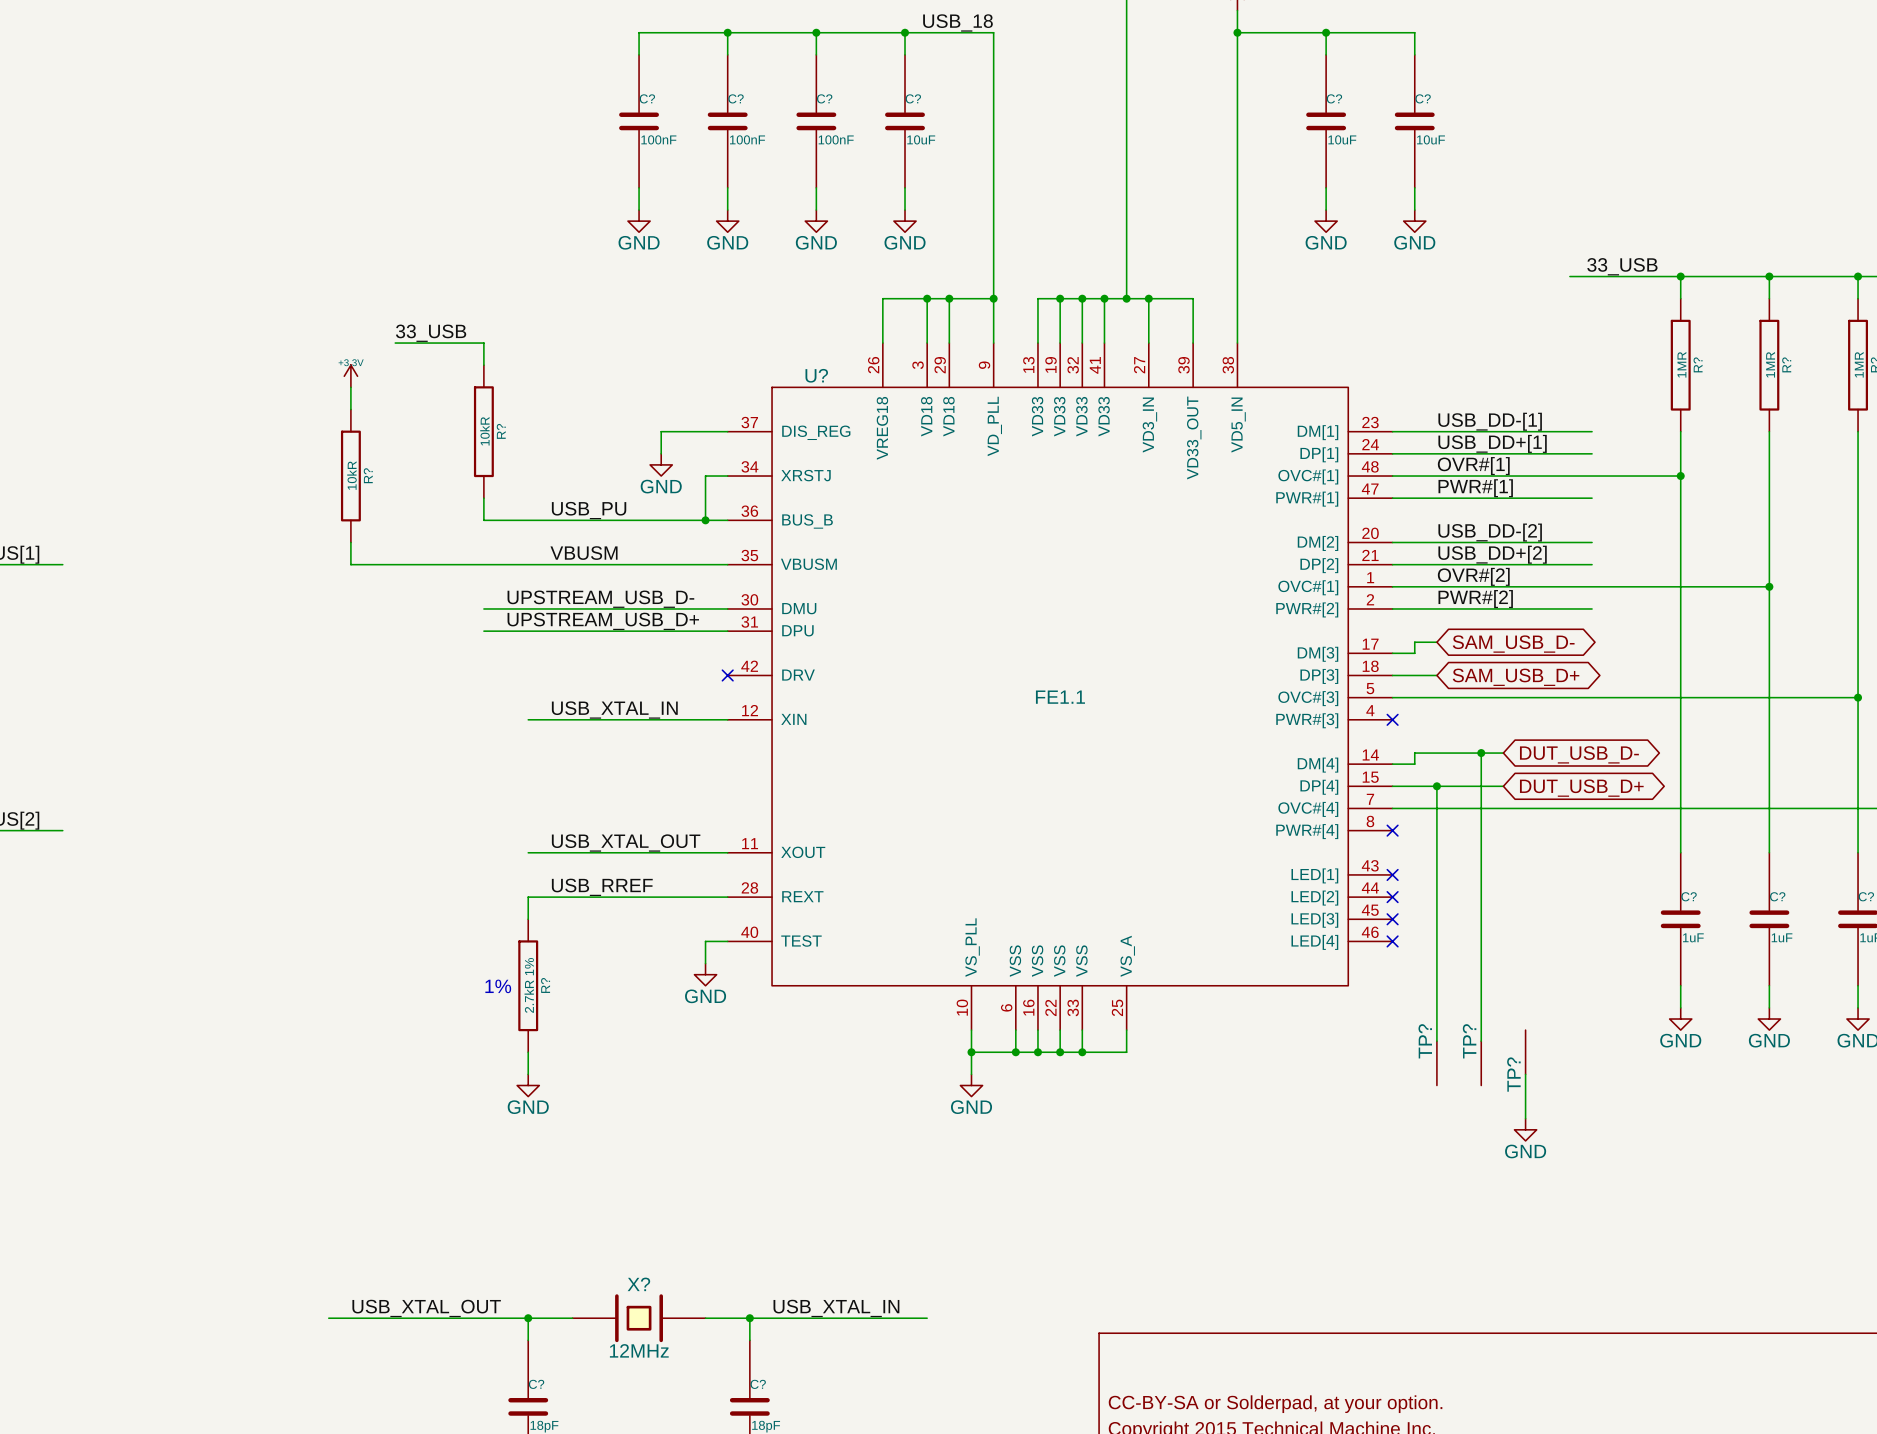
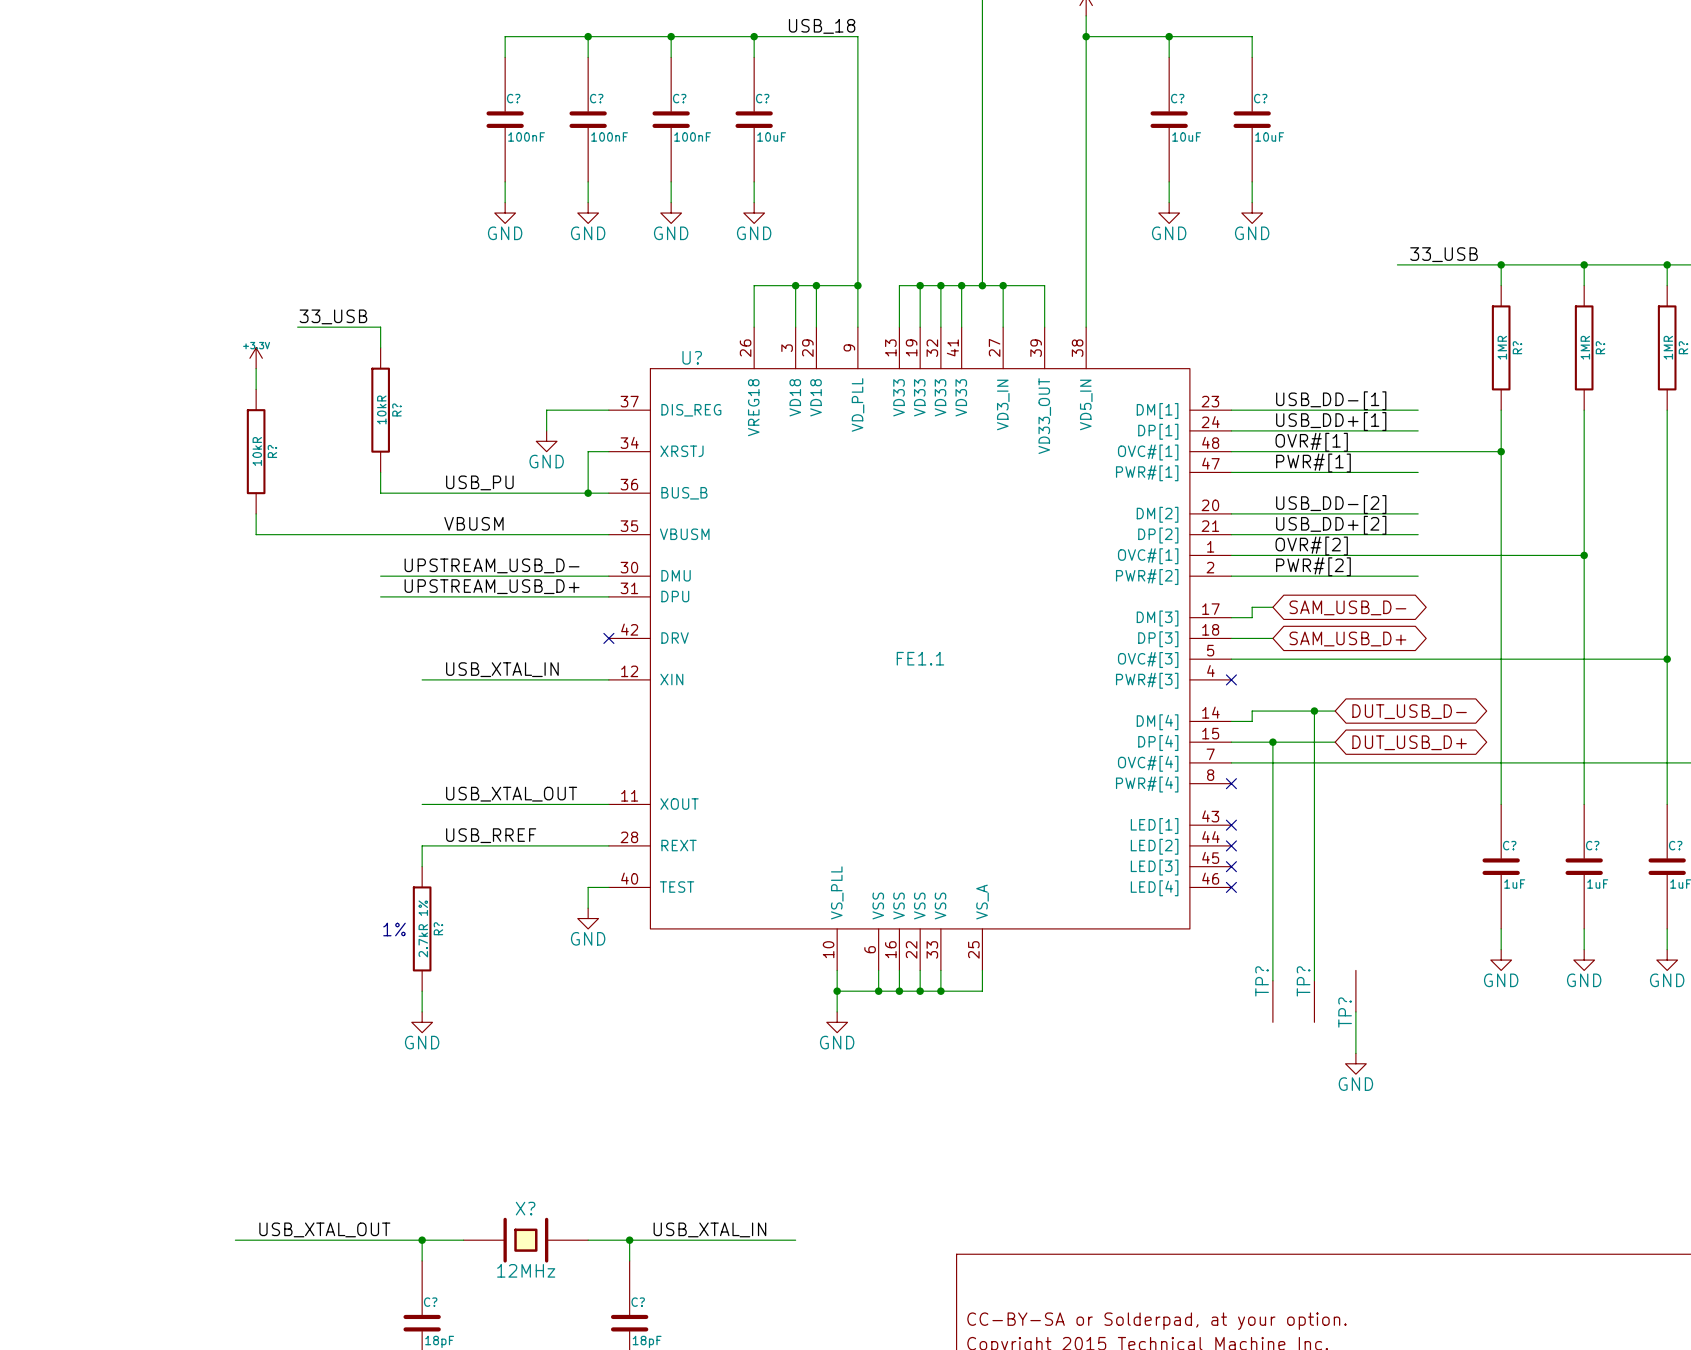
wire: (639, 32) (639, 54) -> (525, 36) (505, 36) (505, 57)
wire: (727, 32) (727, 54) -> (588, 36) (588, 57)
junction position: (727, 32) -> (588, 36)
wire: (816, 32) (816, 54) -> (671, 36) (671, 57)
junction position: (816, 32) -> (671, 36)
wire: (905, 32) (905, 54) -> (754, 36) (754, 57)
junction position: (905, 32) -> (754, 36)
C? position: (639, 121) -> (505, 119)
C? position: (727, 121) -> (588, 119)
C? position: (816, 121) -> (671, 119)
C? position: (905, 121) -> (754, 119)
wire: (639, 187) (639, 210) -> (505, 181) (505, 202)
wire: (727, 187) (727, 210) -> (588, 181) (588, 202)
wire: (816, 187) (816, 210) -> (671, 181) (671, 202)
wire: (905, 187) (905, 210) -> (754, 181) (754, 202)
power symbol position: GND (639, 221) -> GND (505, 213)
power symbol position: GND (727, 221) -> GND (588, 213)
power symbol position: GND (816, 221) -> GND (671, 213)
power symbol position: GND (905, 221) -> GND (754, 213)

